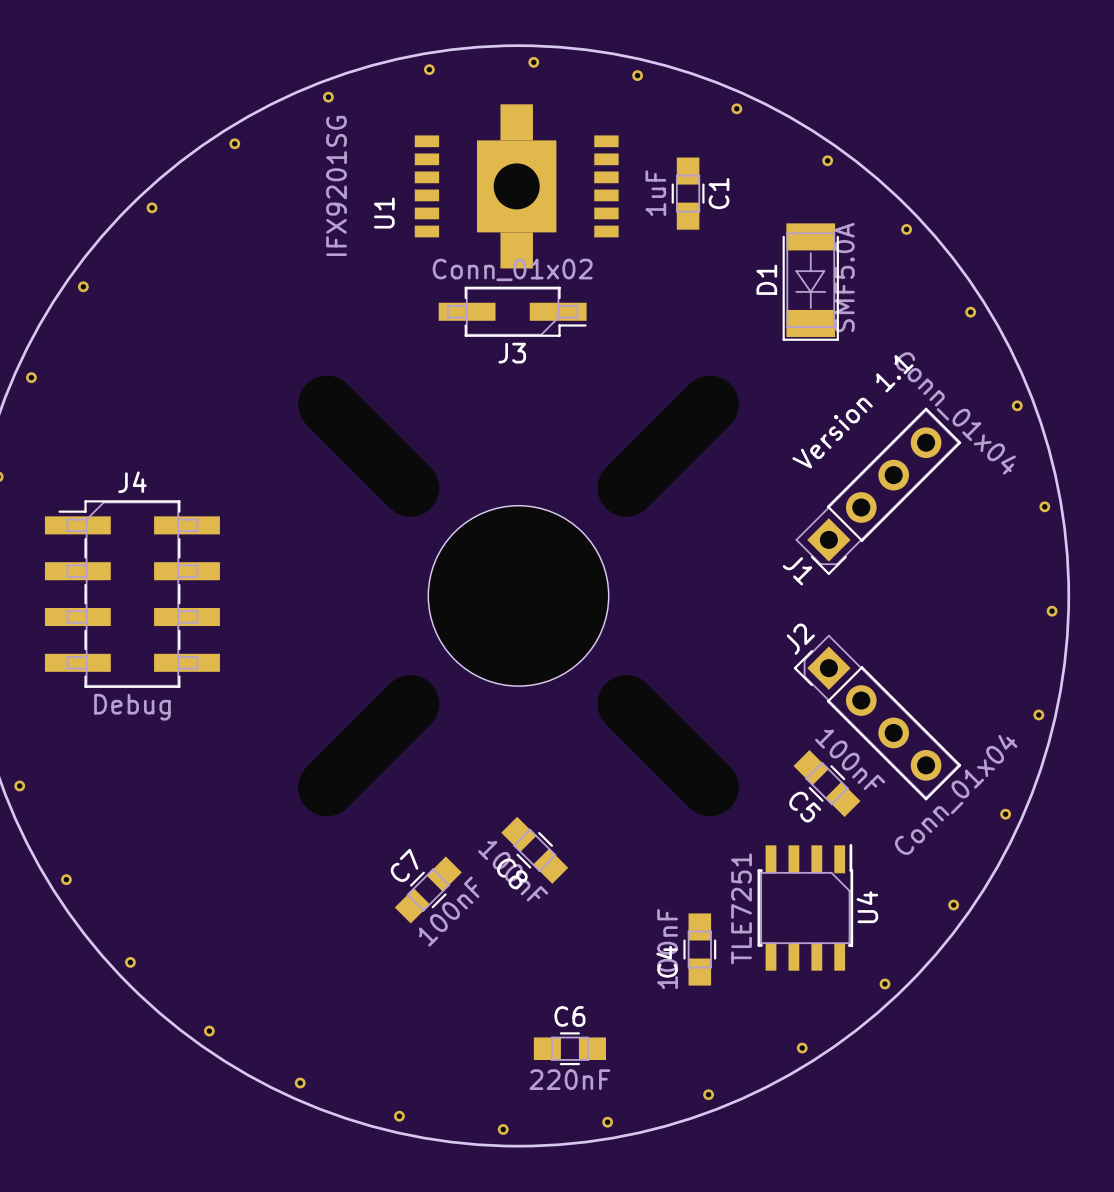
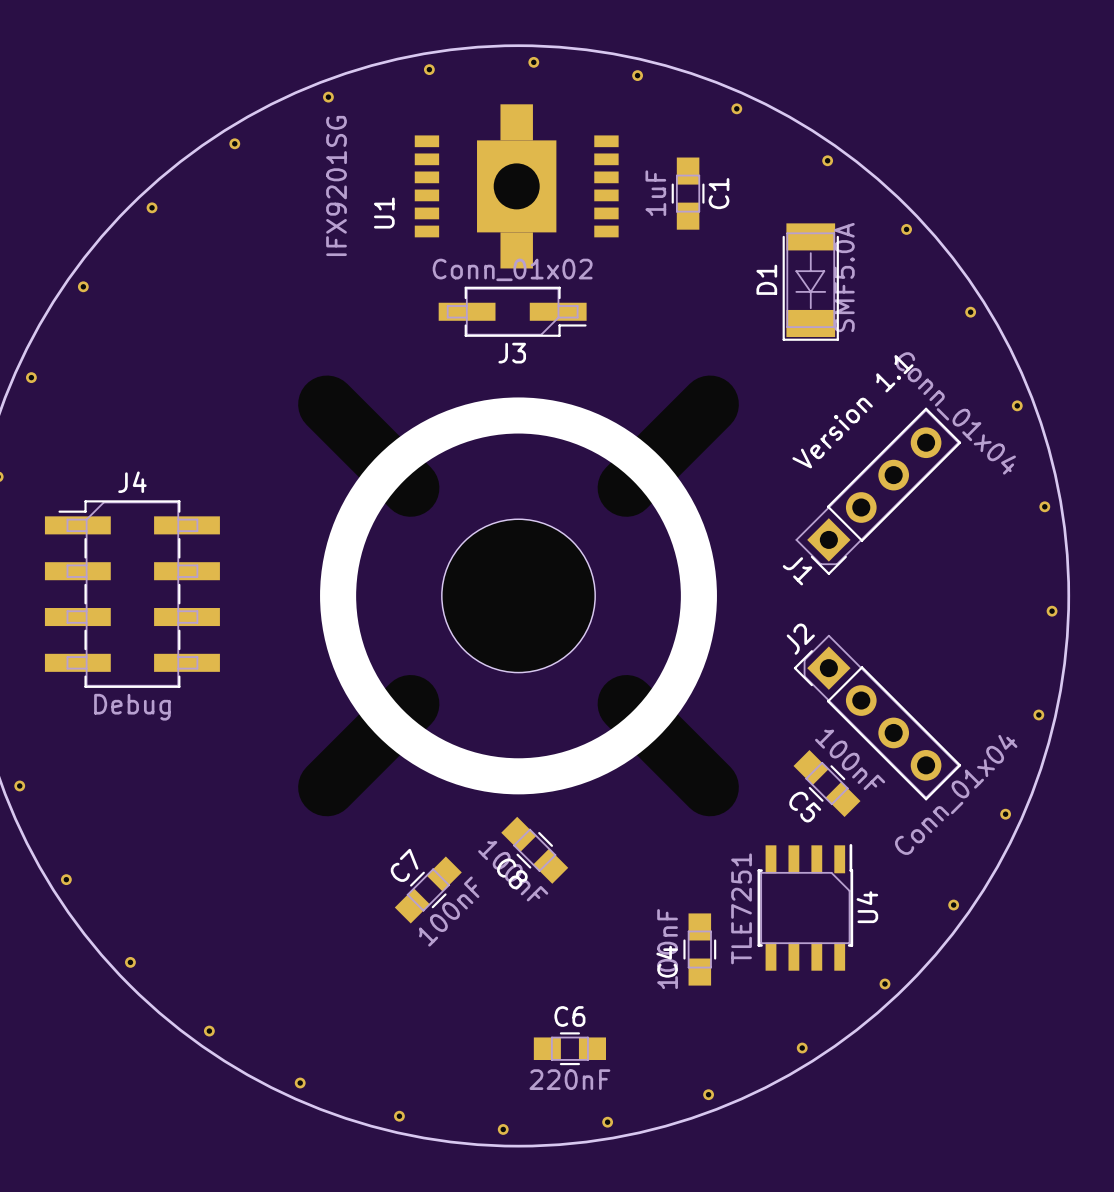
drawing: none -> [320, 397, 717, 795]
part footprint: [428, 505, 609, 687] -> [441, 519, 596, 673]

